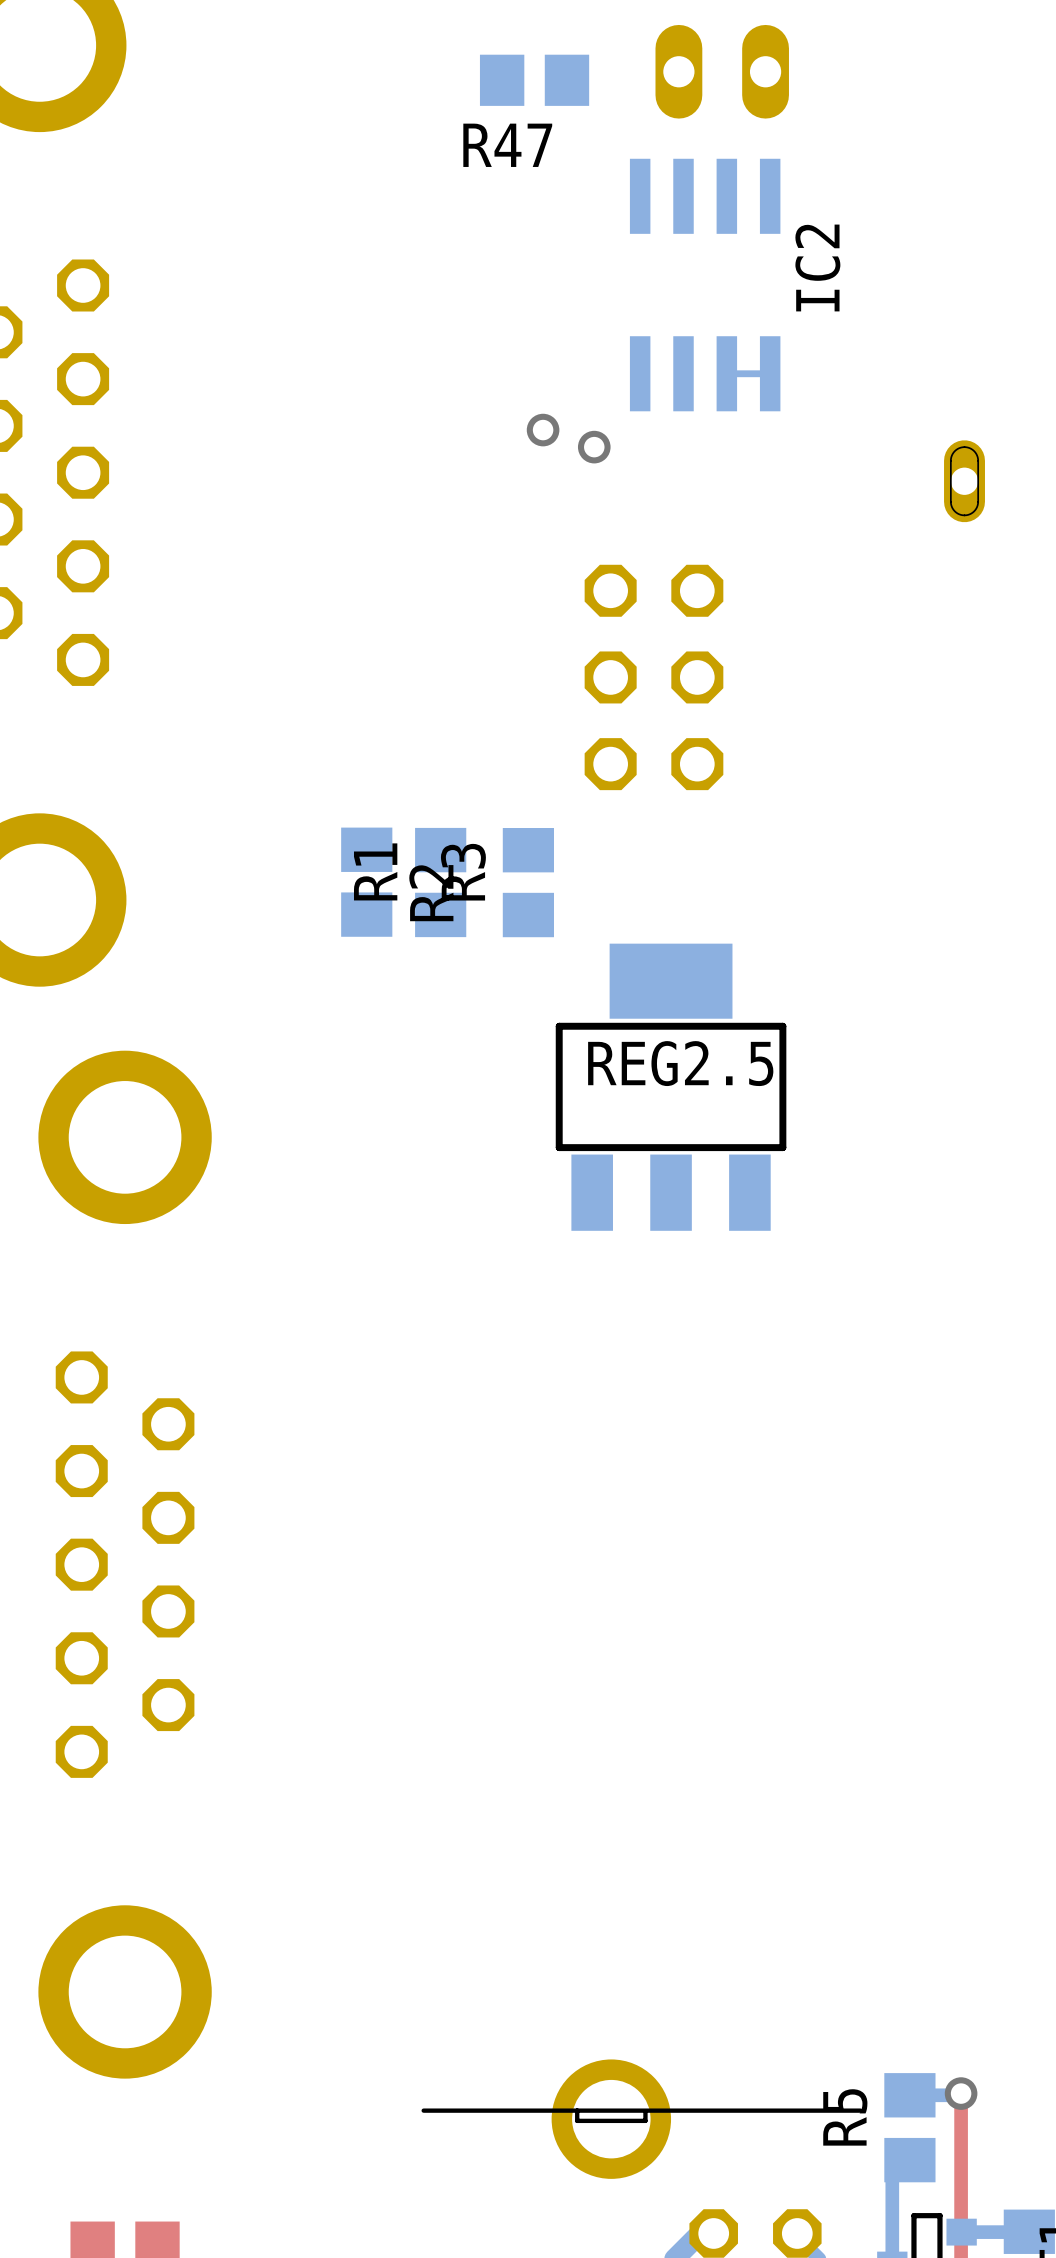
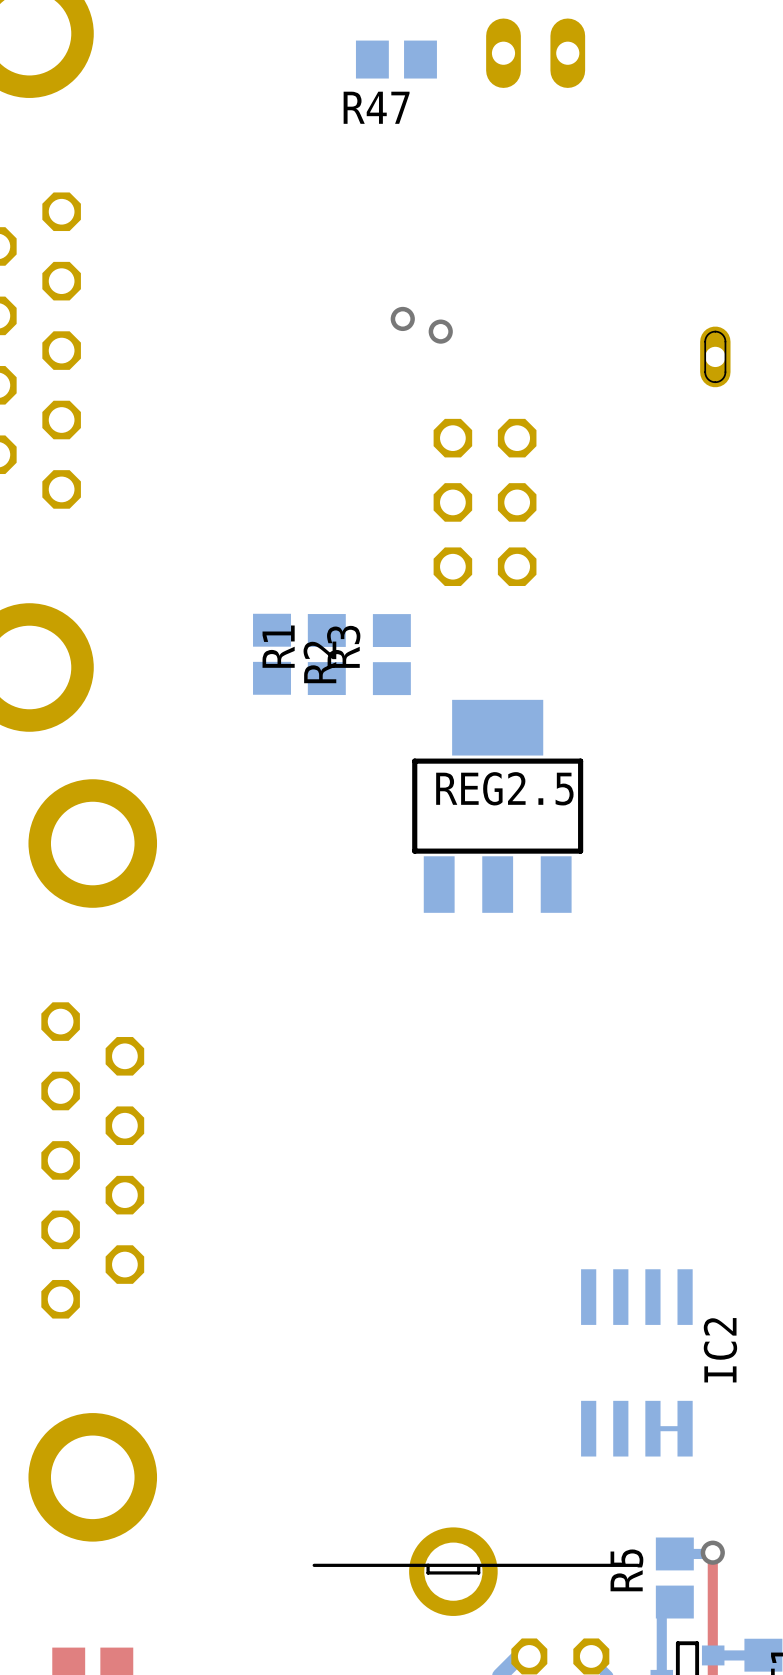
IC2 position: (705, 285) -> (636, 1362)
bottom track: (770, 373) (726, 373) -> none
bottom track: none -> (685, 1428) (652, 1428)

